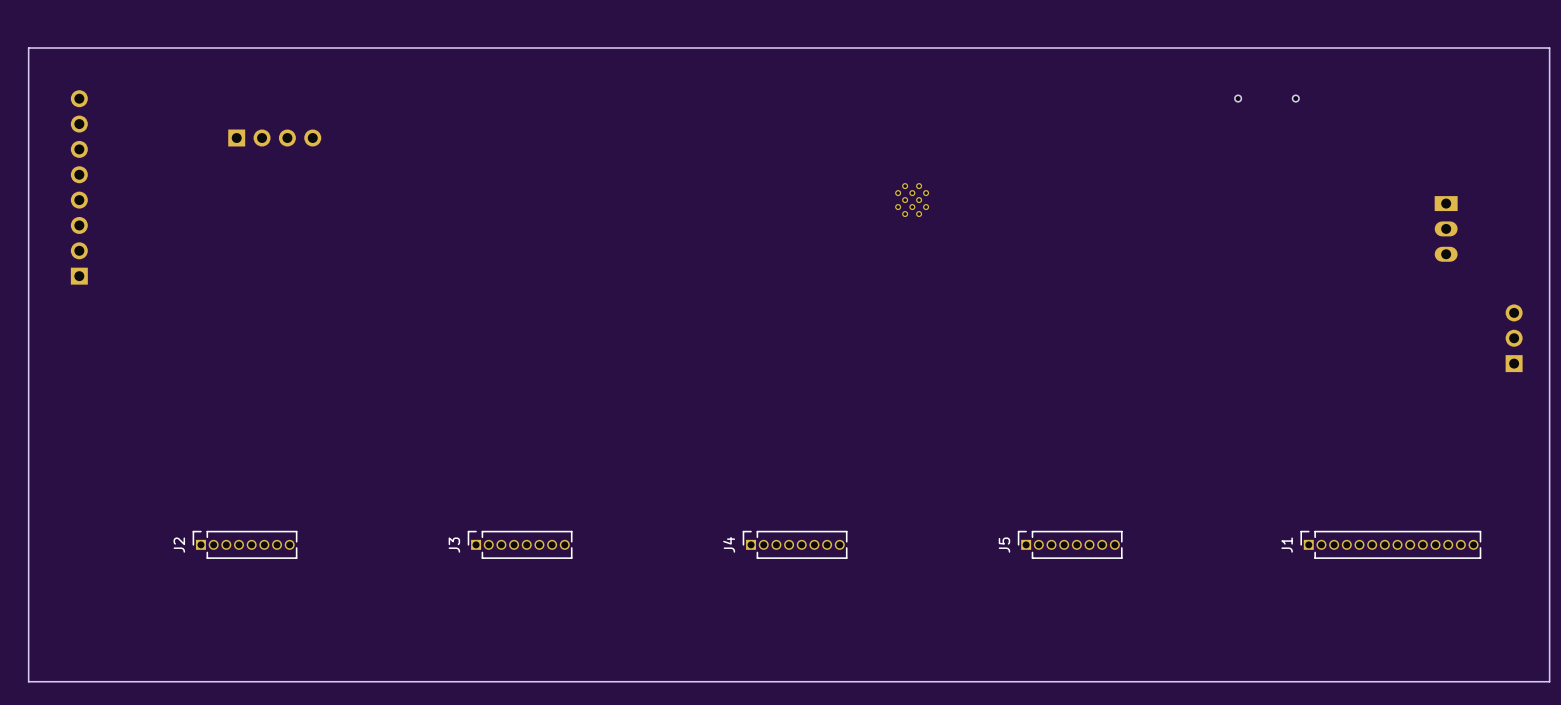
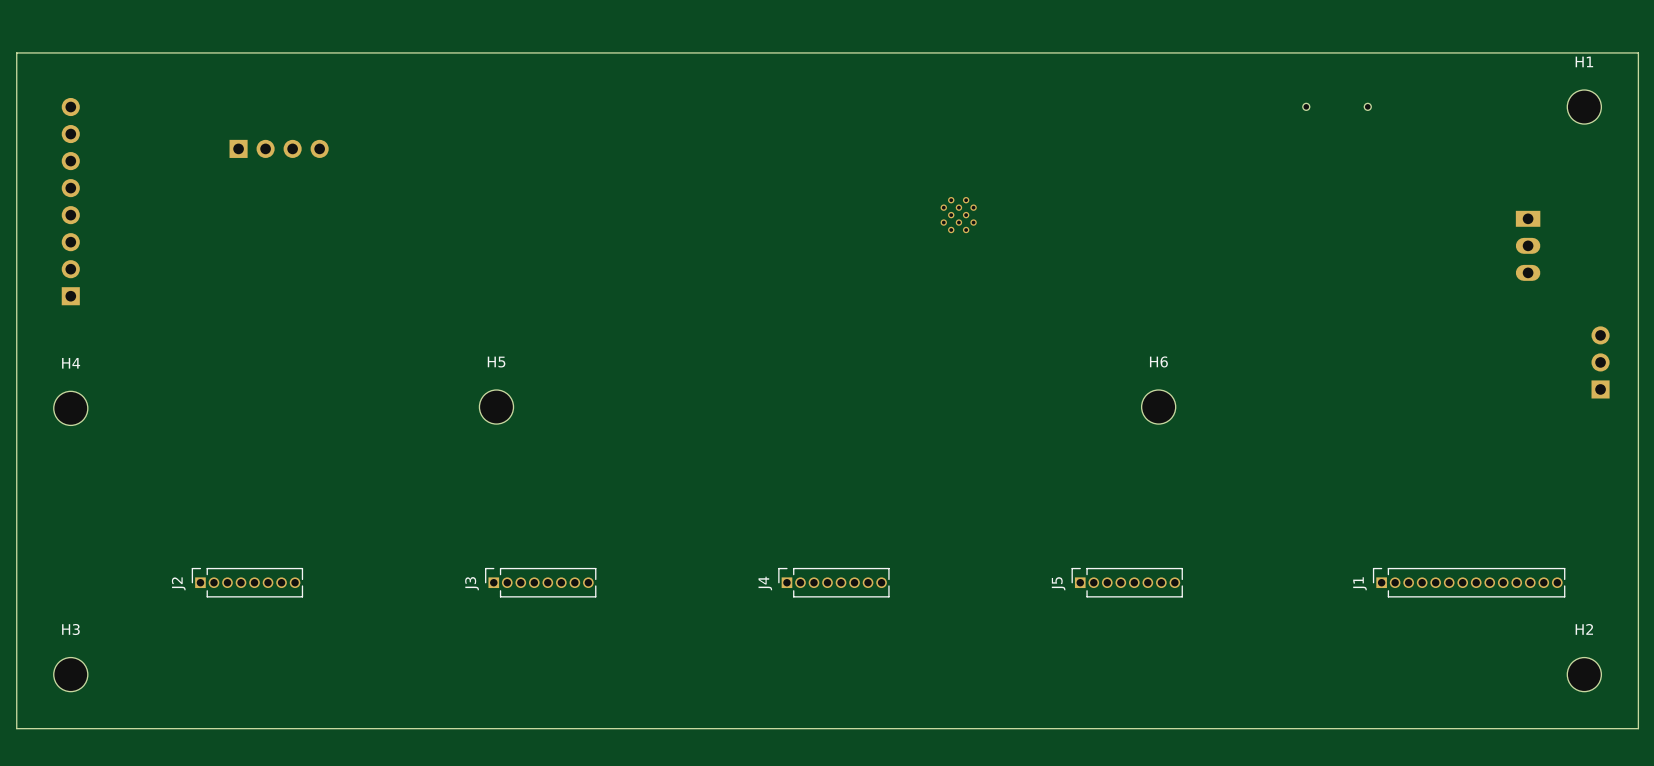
H1: none -> (1584, 107)
H5: none -> (496, 407)
H6: none -> (1158, 407)
H4: none -> (70, 408)
H3: none -> (70, 674)
H2: none -> (1584, 674)

